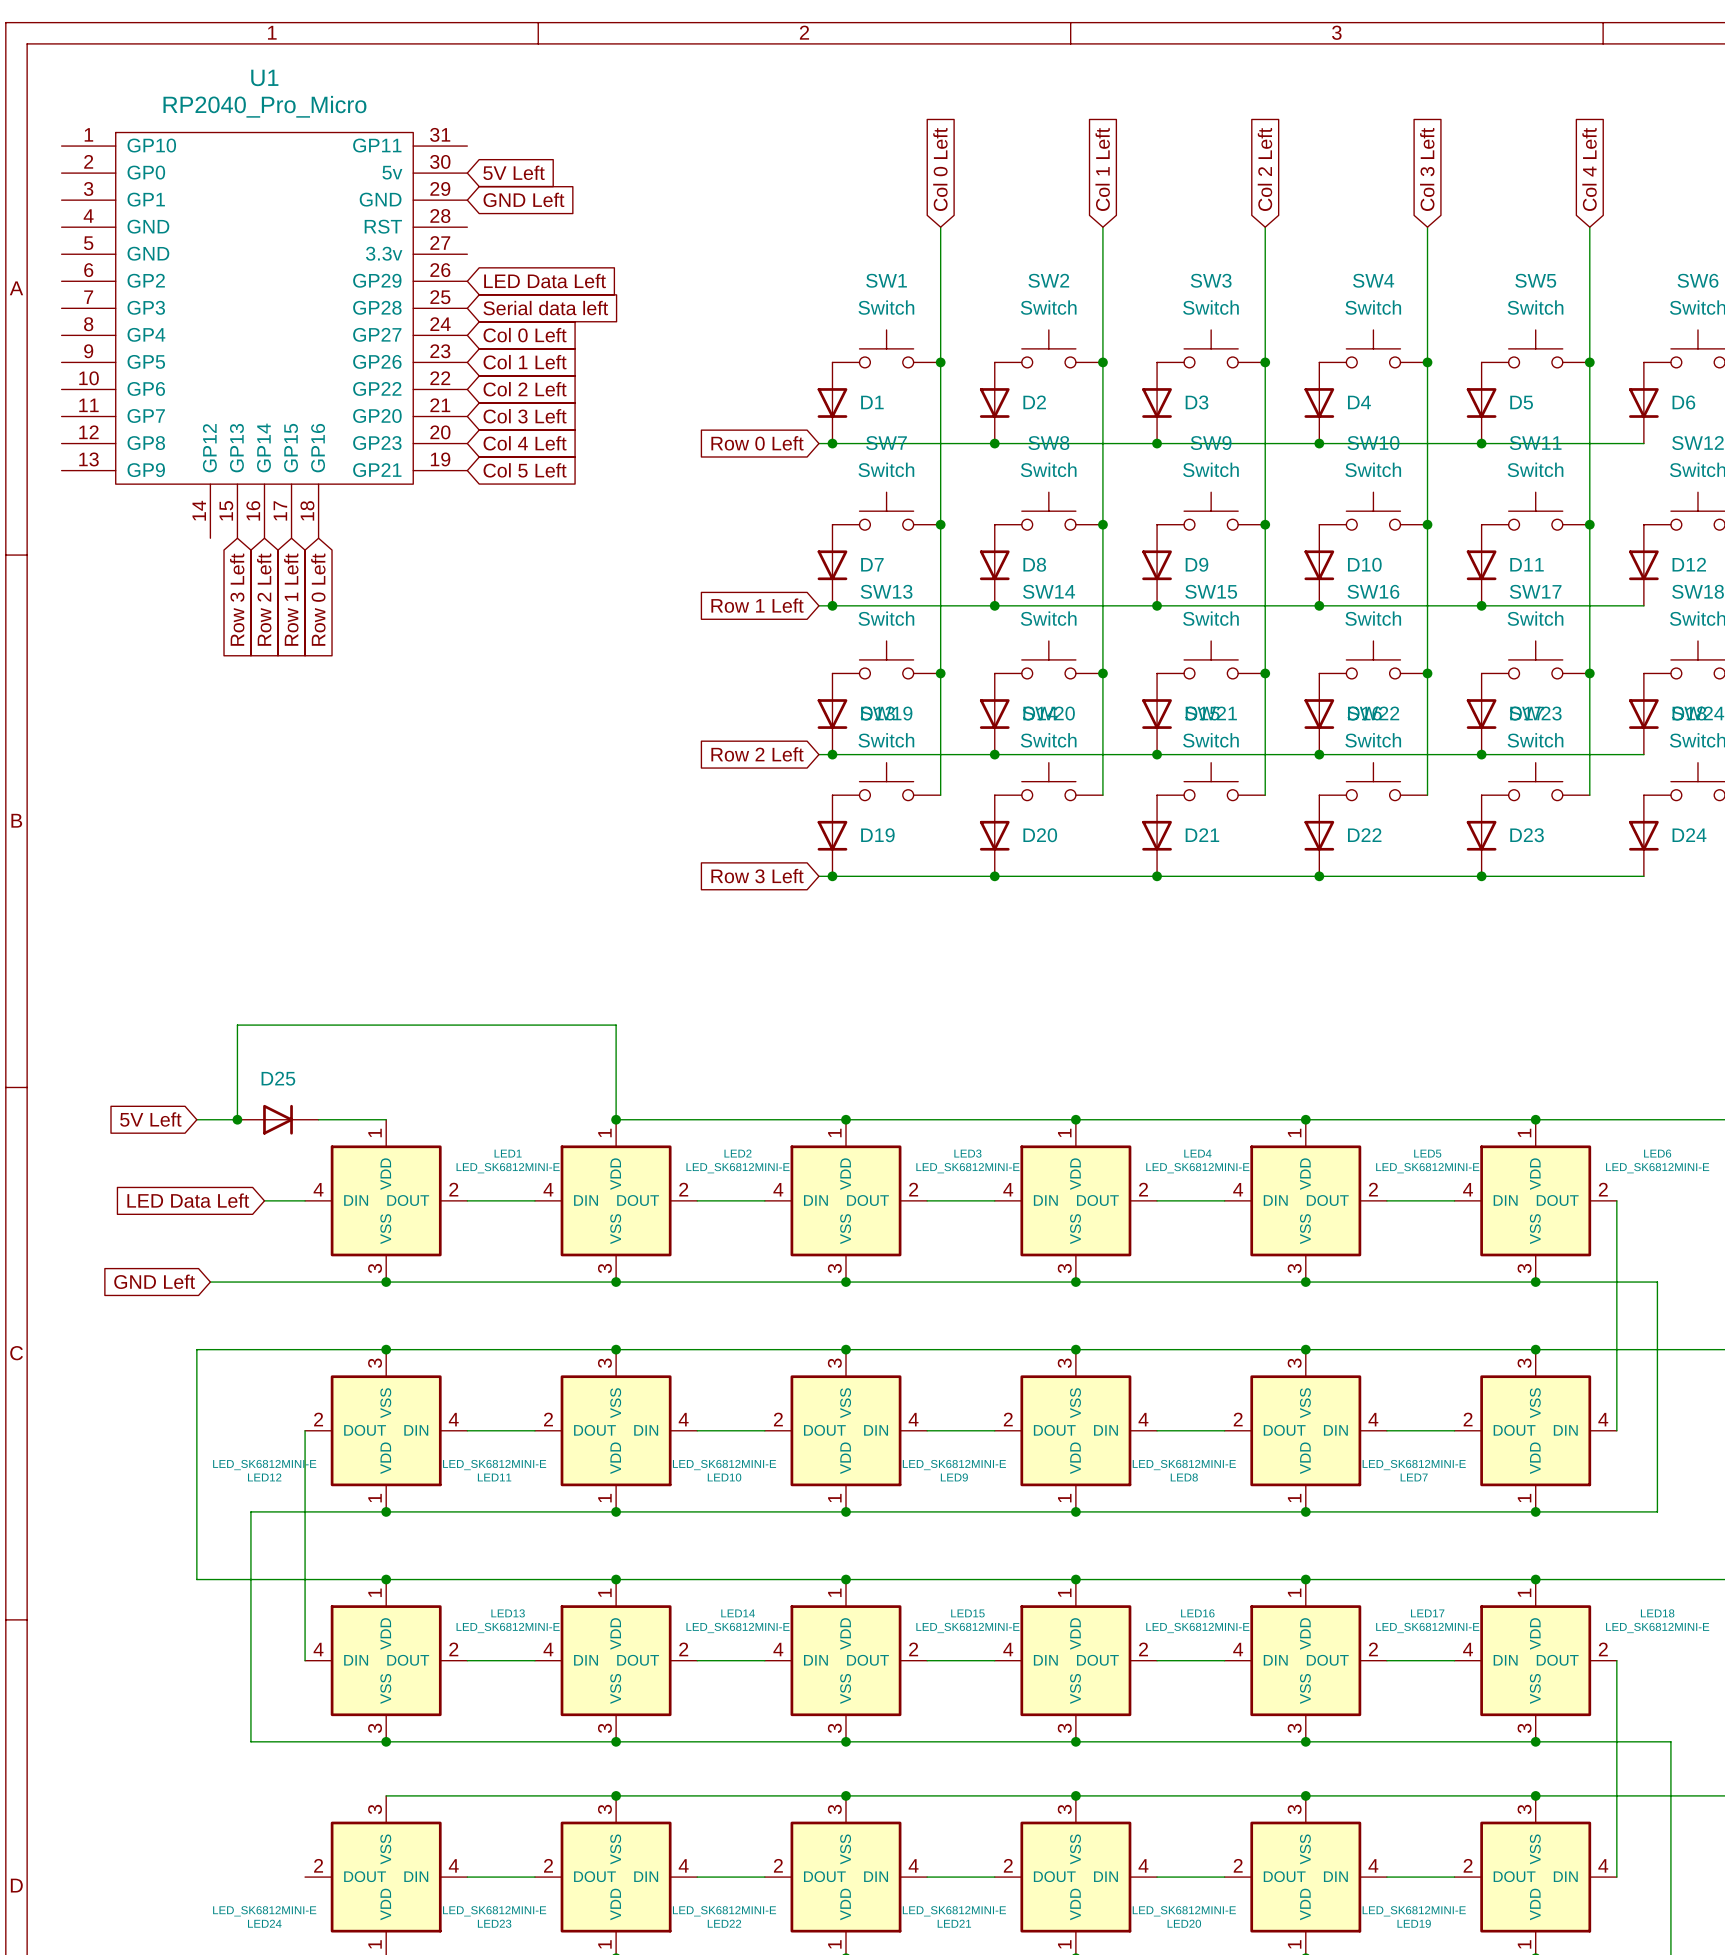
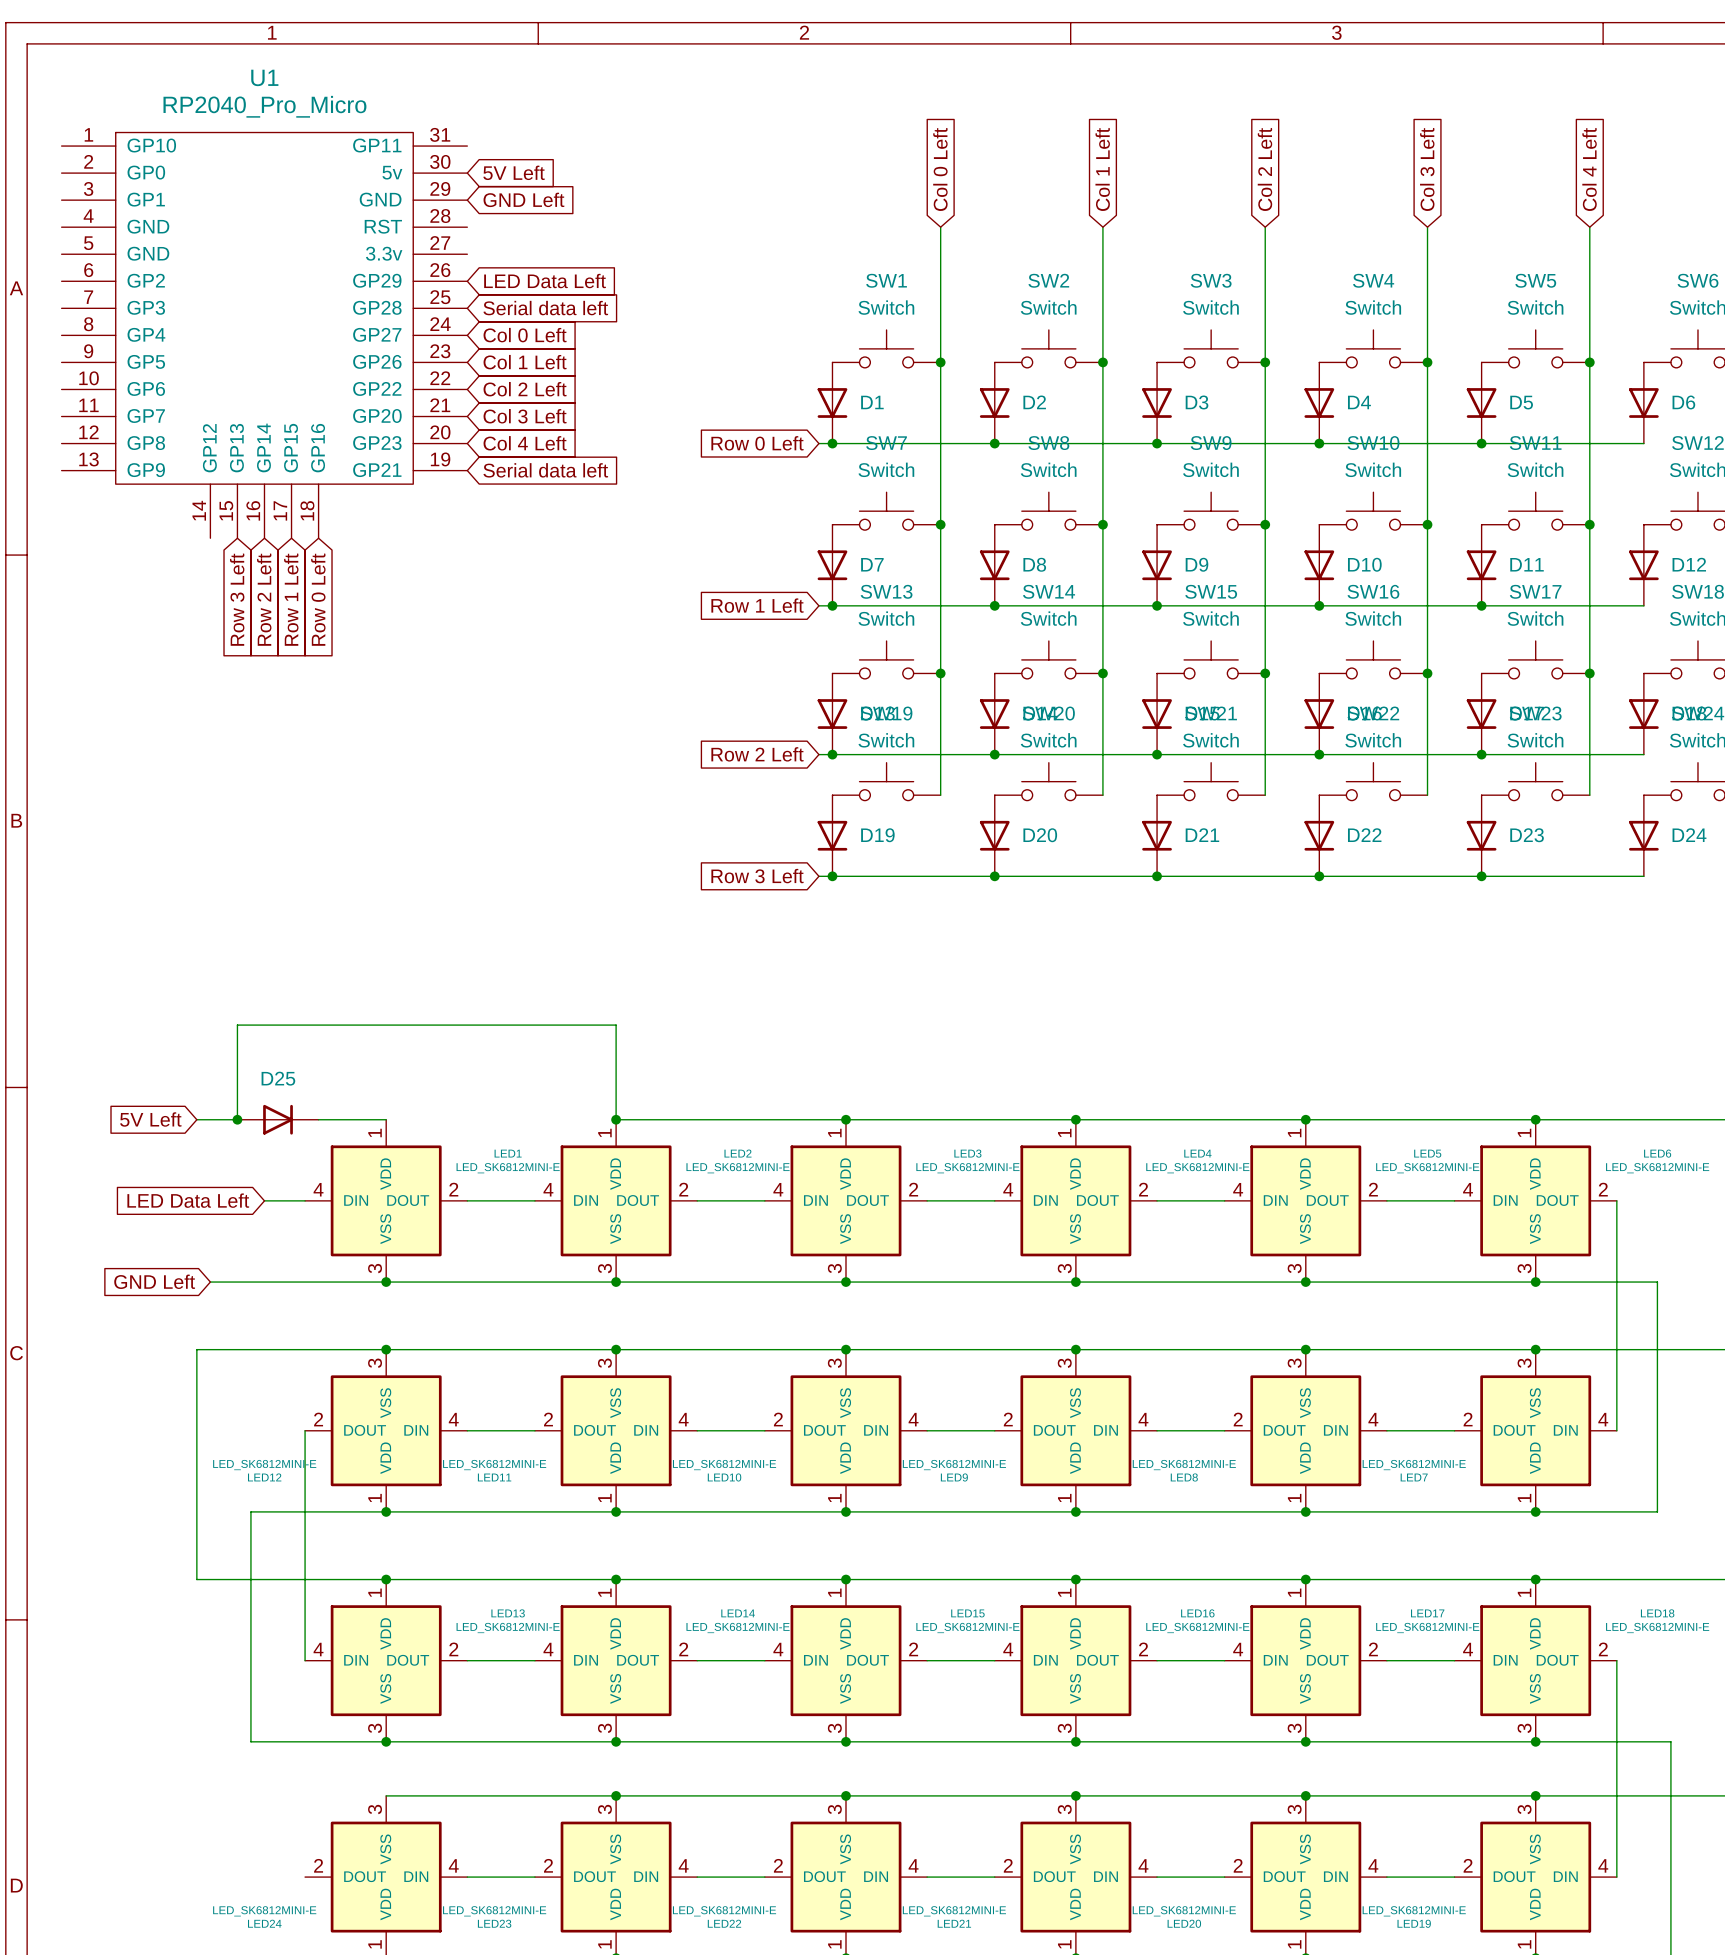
global label: Col 5 Left (525, 470) -> Serial data left (545, 470)

